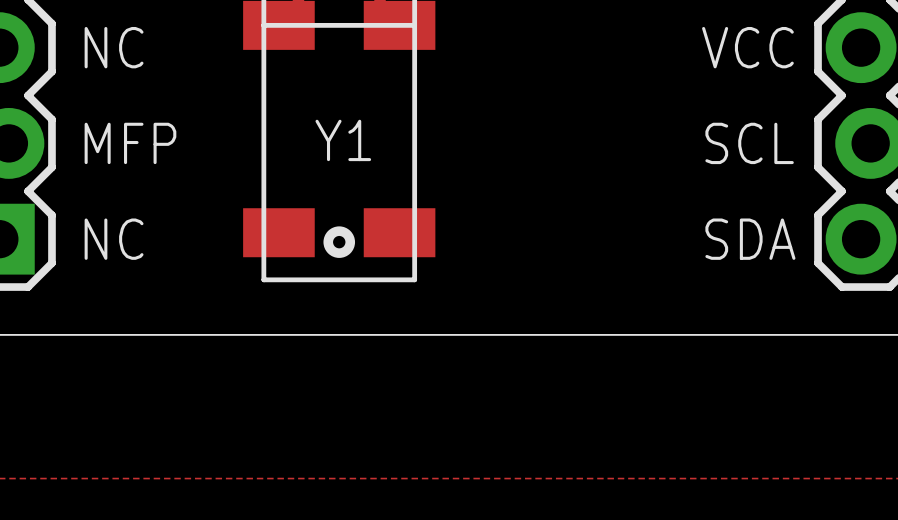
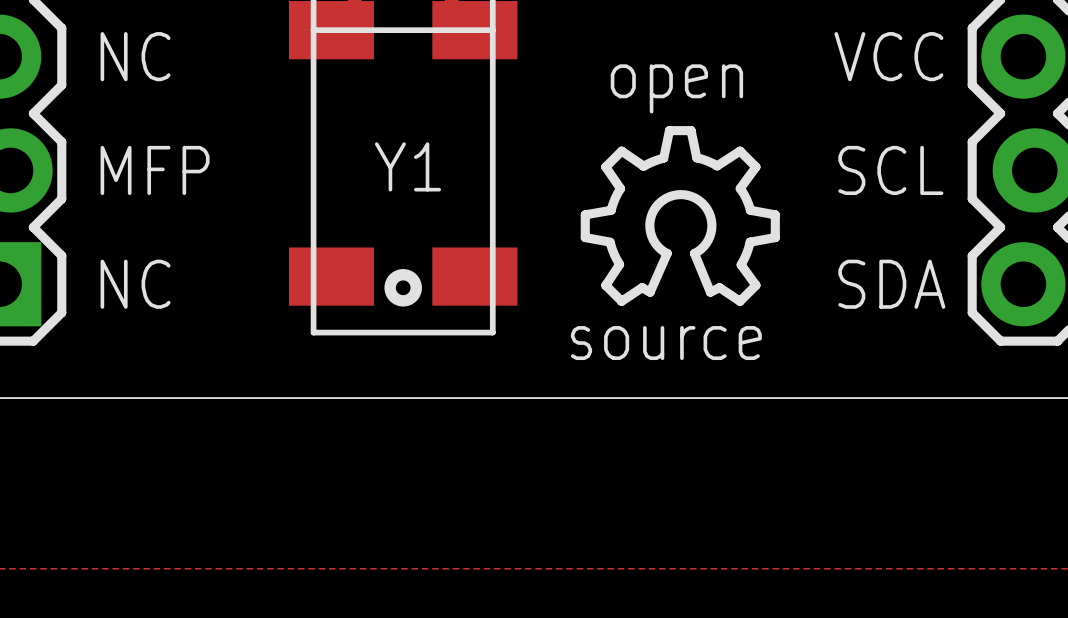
text: none -> open (676, 88)
drawing: none -> [580, 126, 780, 306]
text: none -> source (666, 343)

